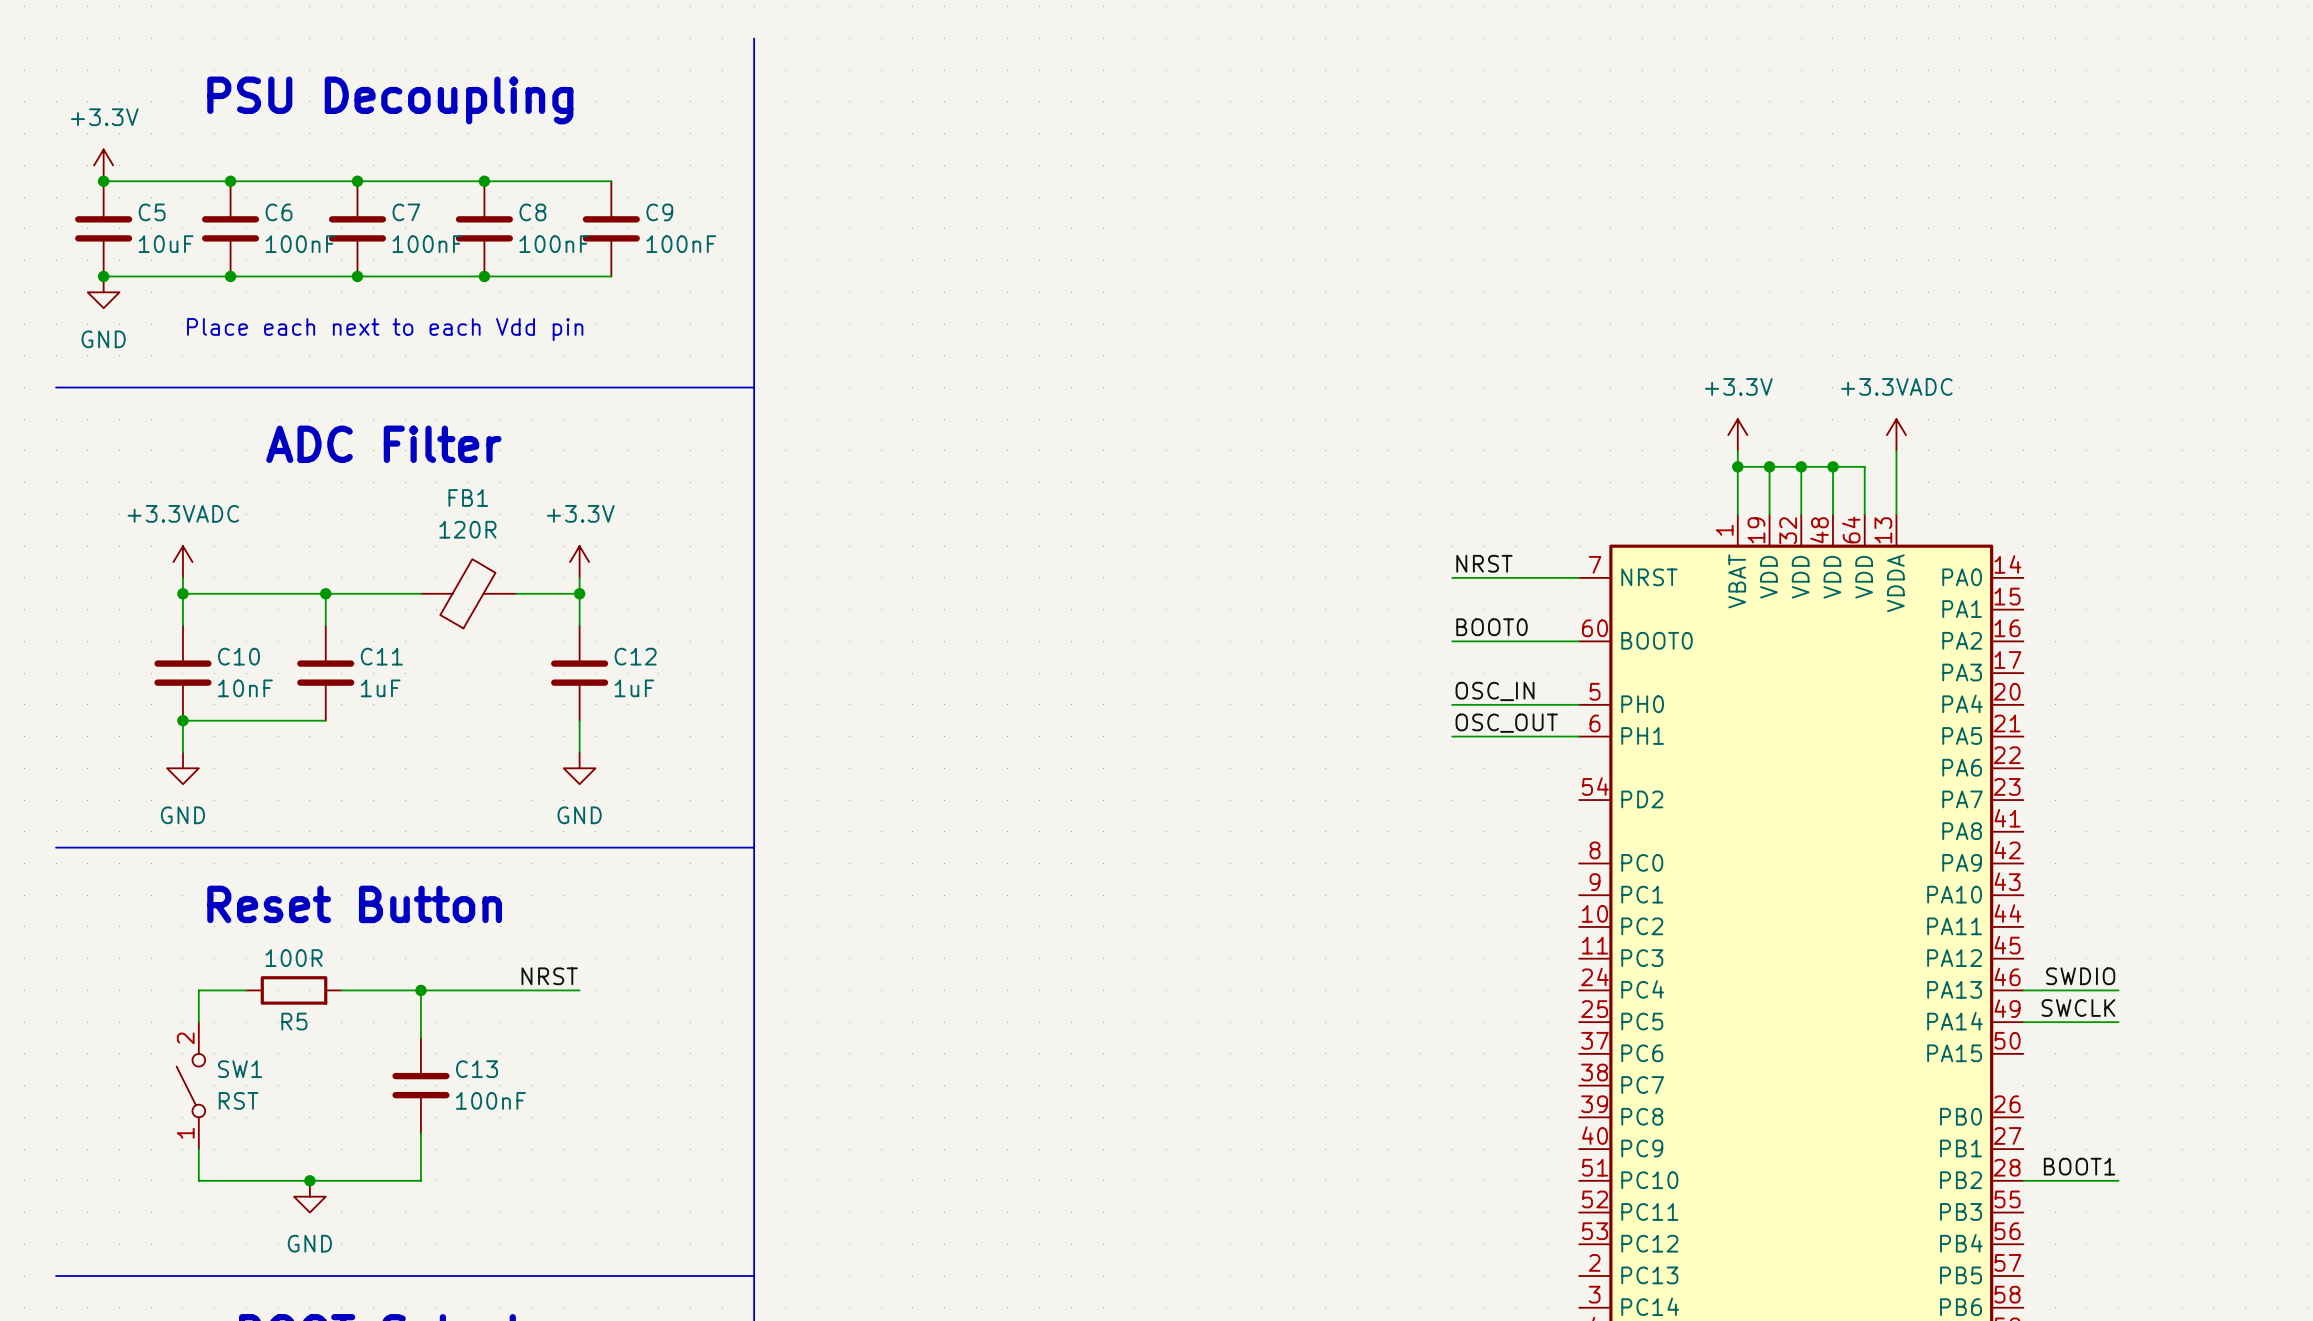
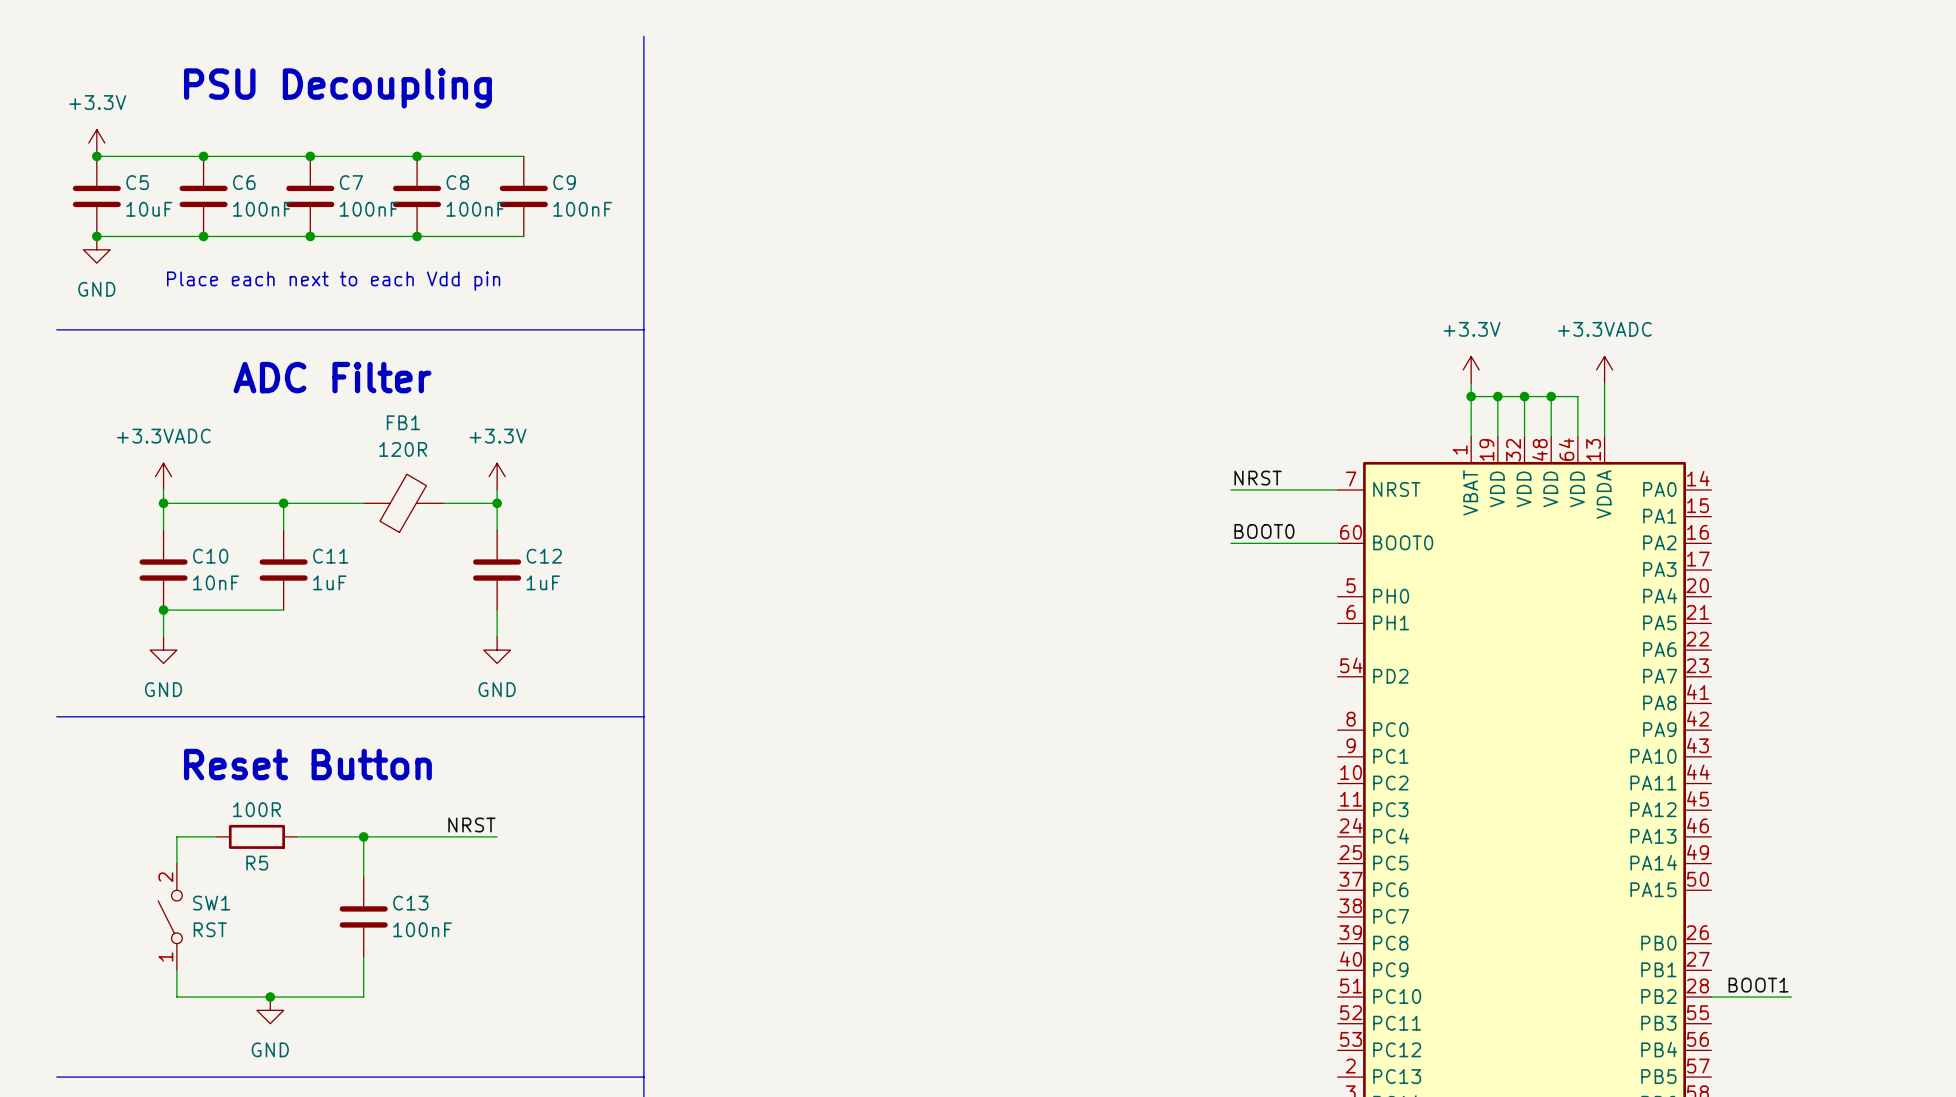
label: OSC_IN (1495, 691) -> none
wire: (1452, 704) (1579, 704) -> none
label: OSC_OUT (1506, 723) -> none
wire: (1452, 736) (1579, 736) -> none
label: SWDIO (2080, 976) -> none
wire: (2023, 990) (2118, 990) -> none
label: SWCLK (2078, 1008) -> none
wire: (2023, 1022) (2118, 1022) -> none

